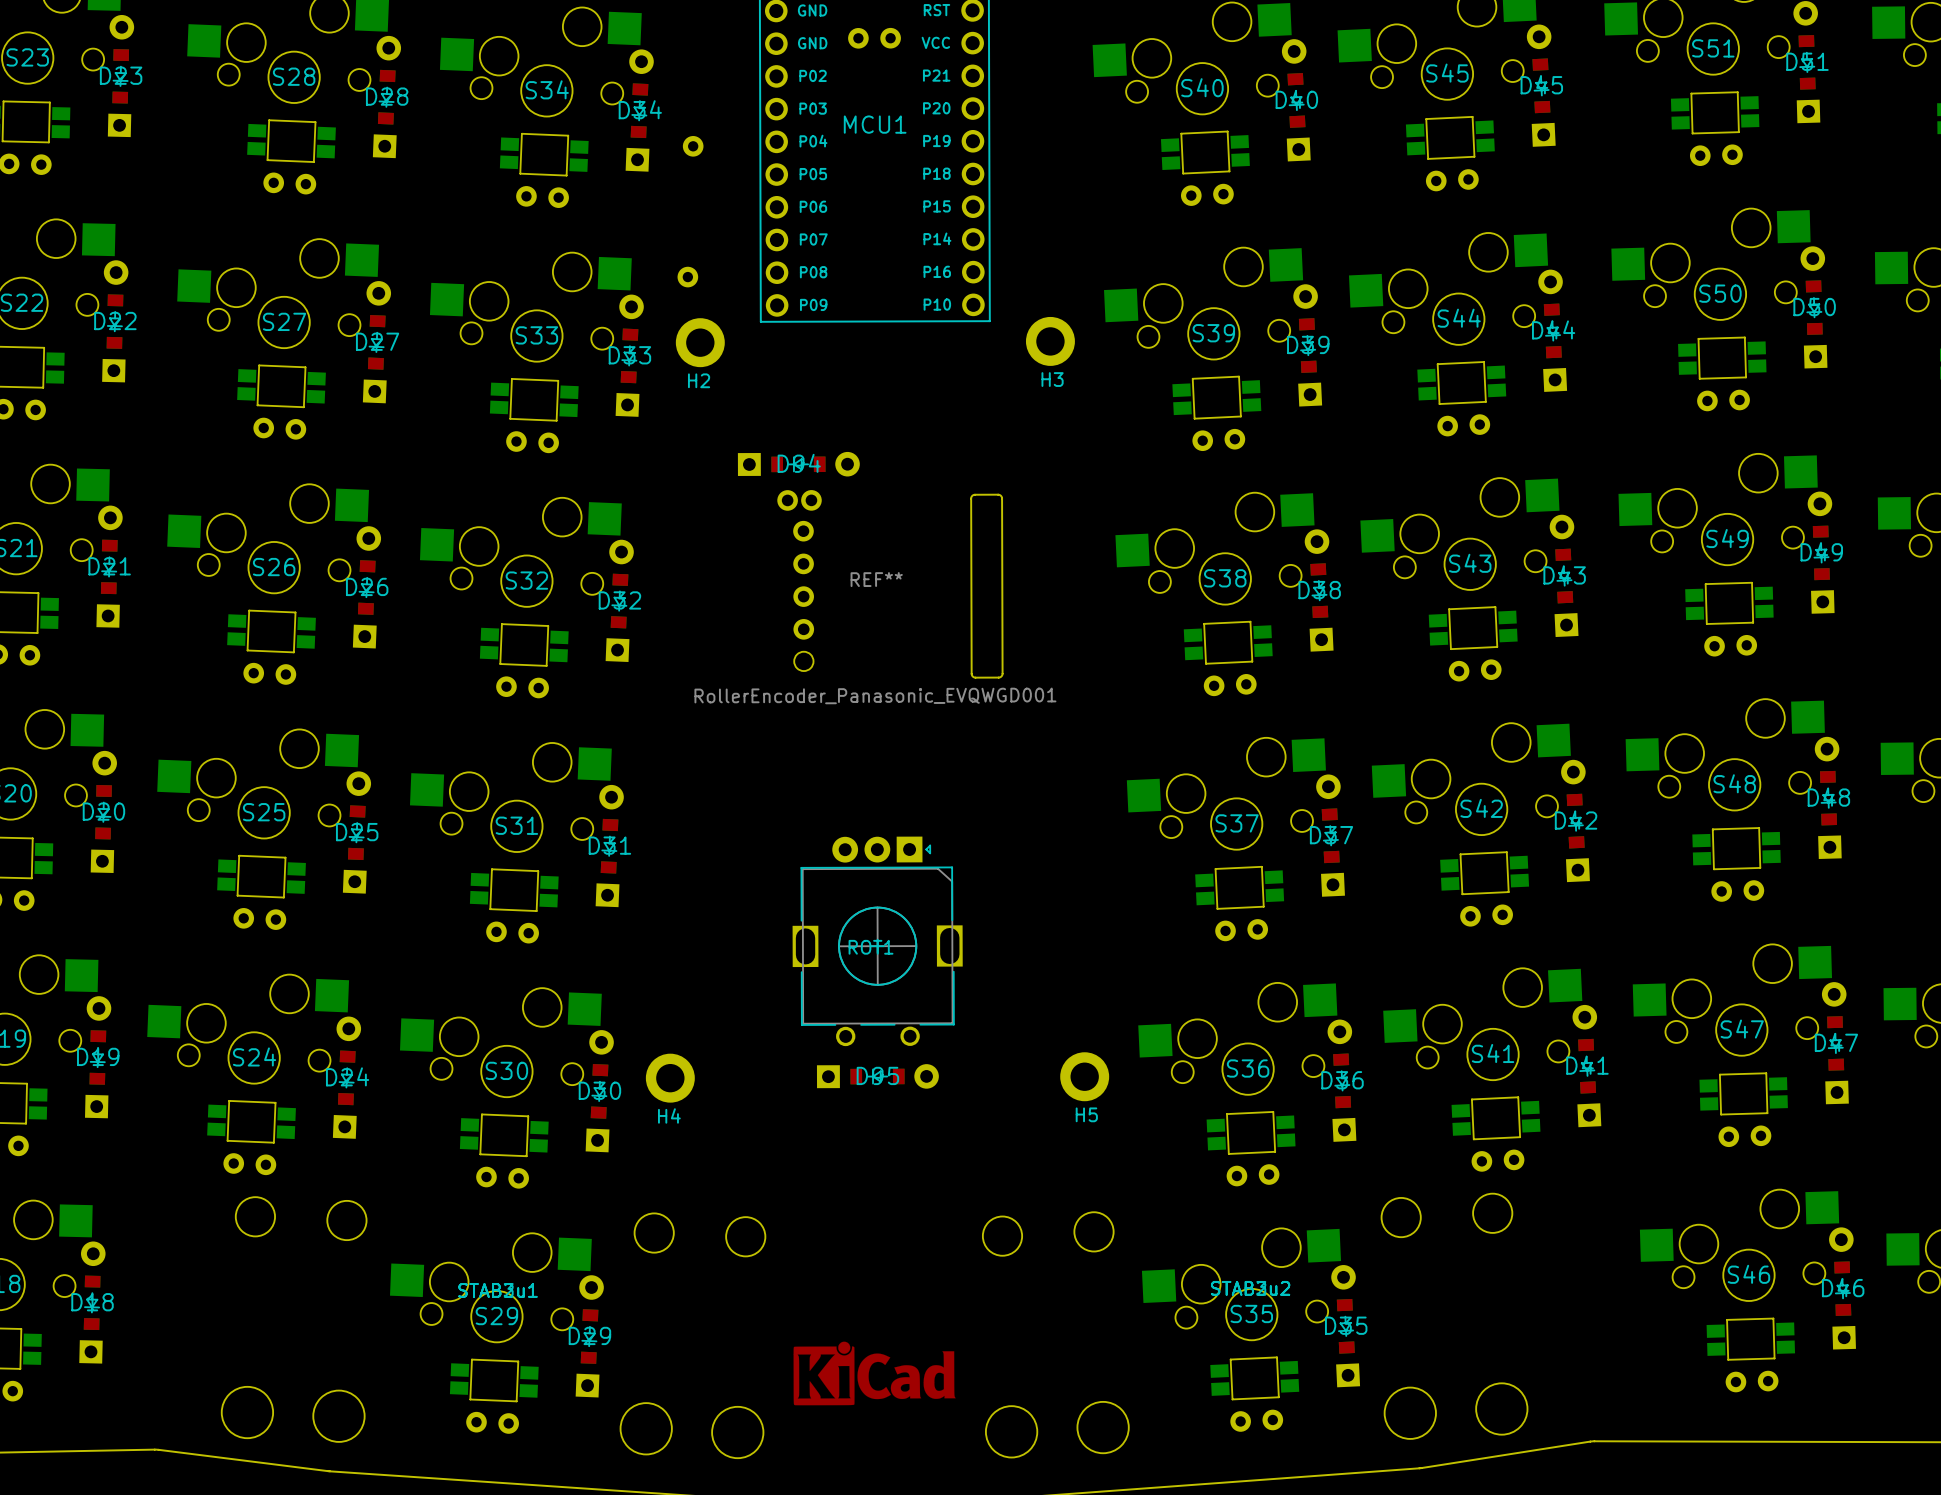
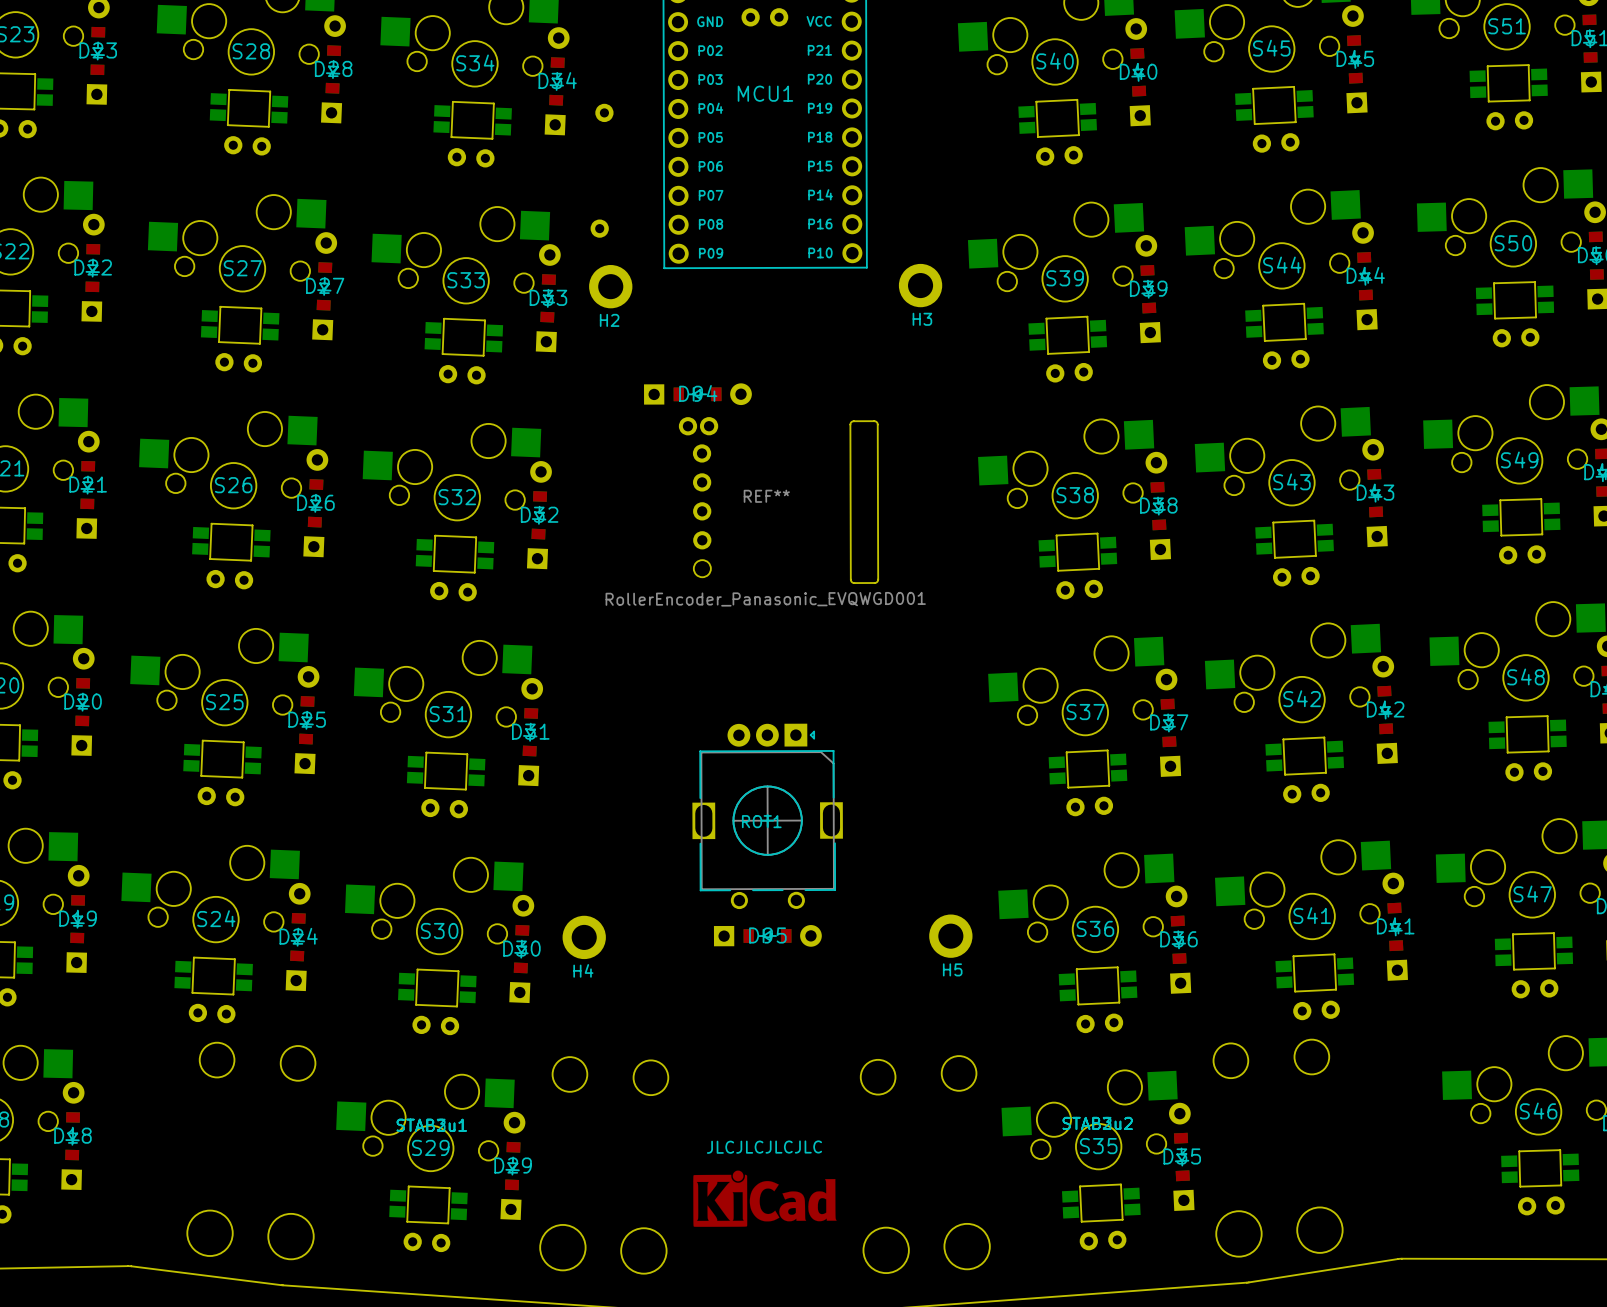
text: none -> JLCJLCJLCJLC (764, 1147)

